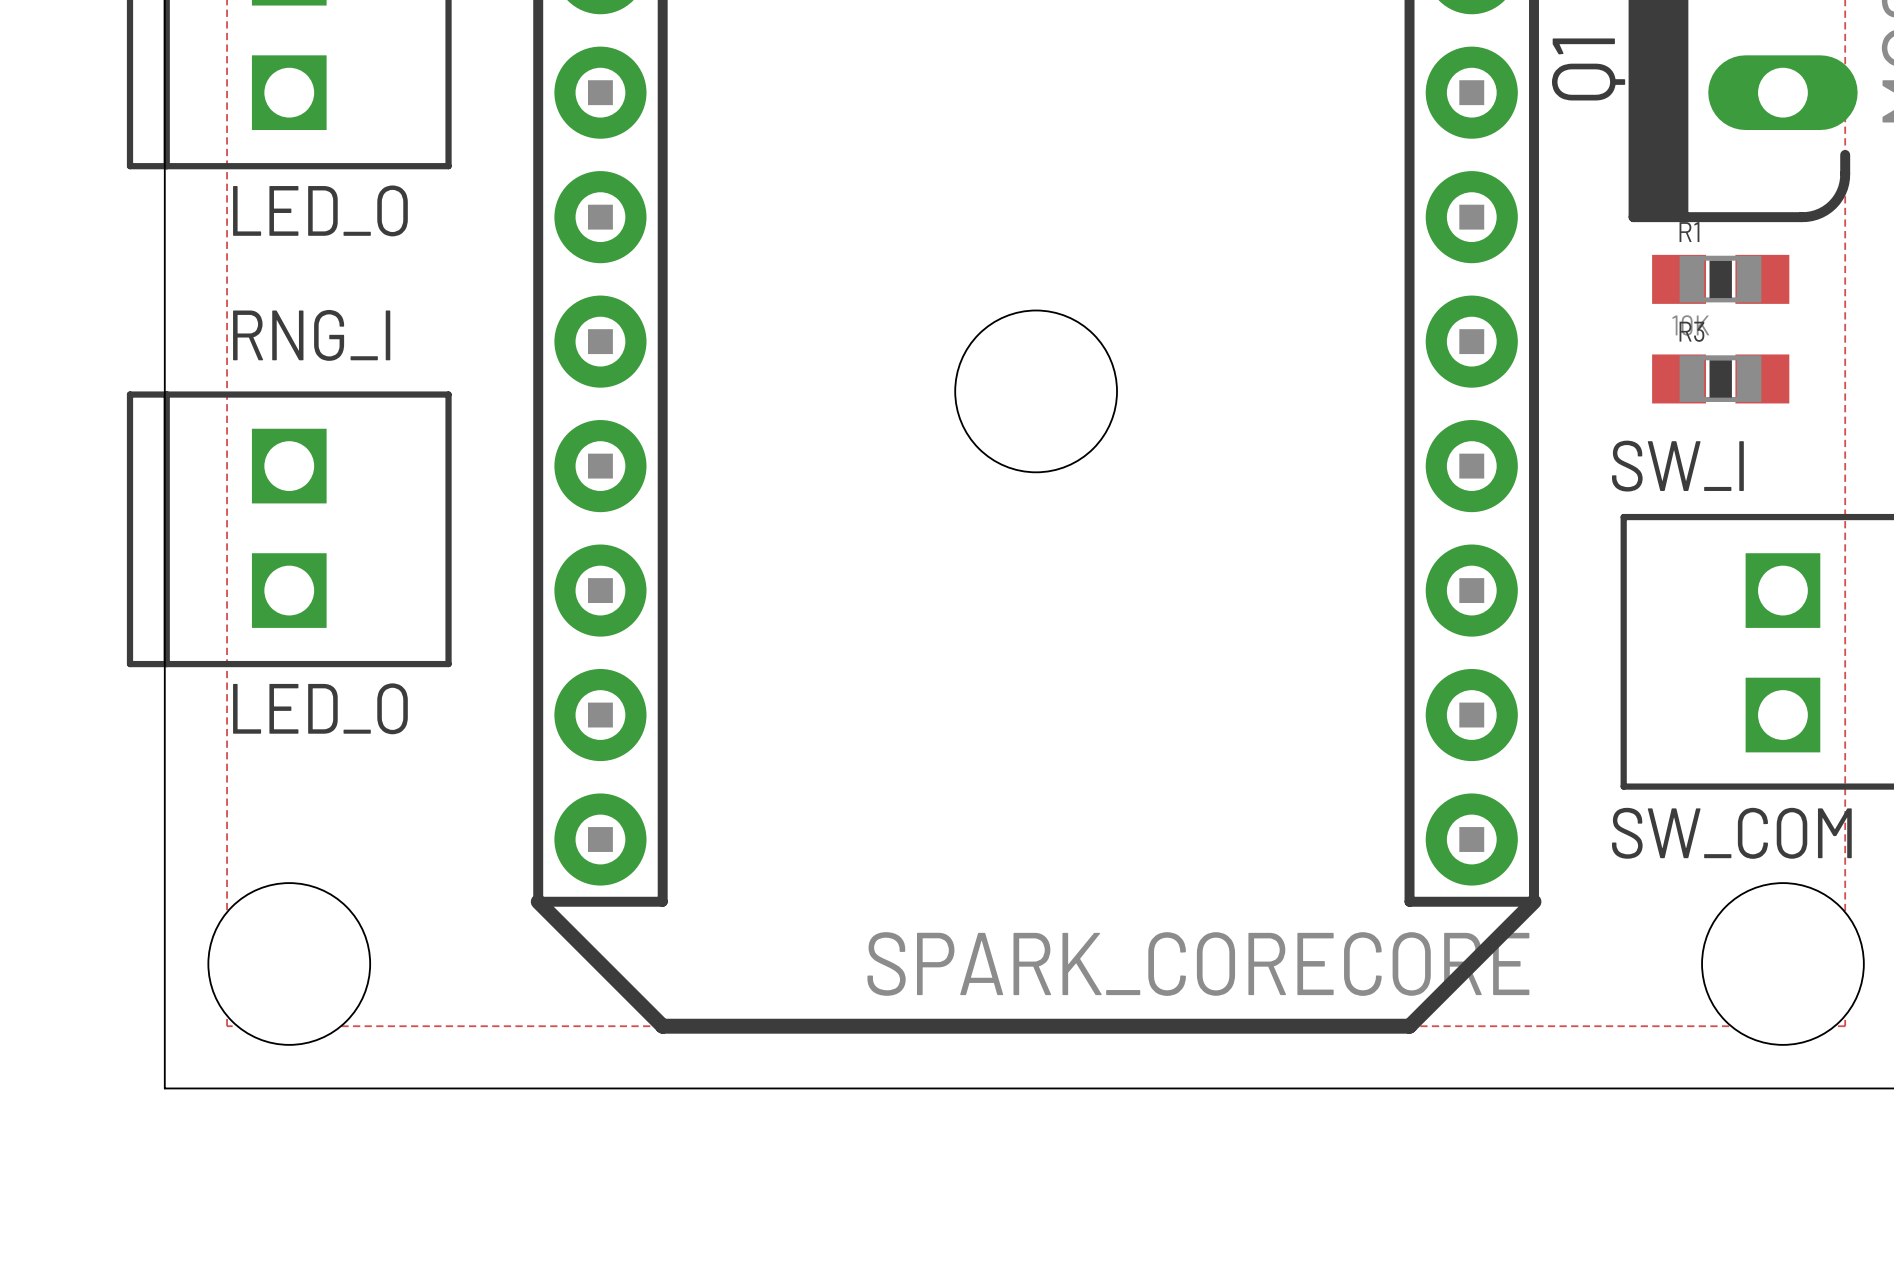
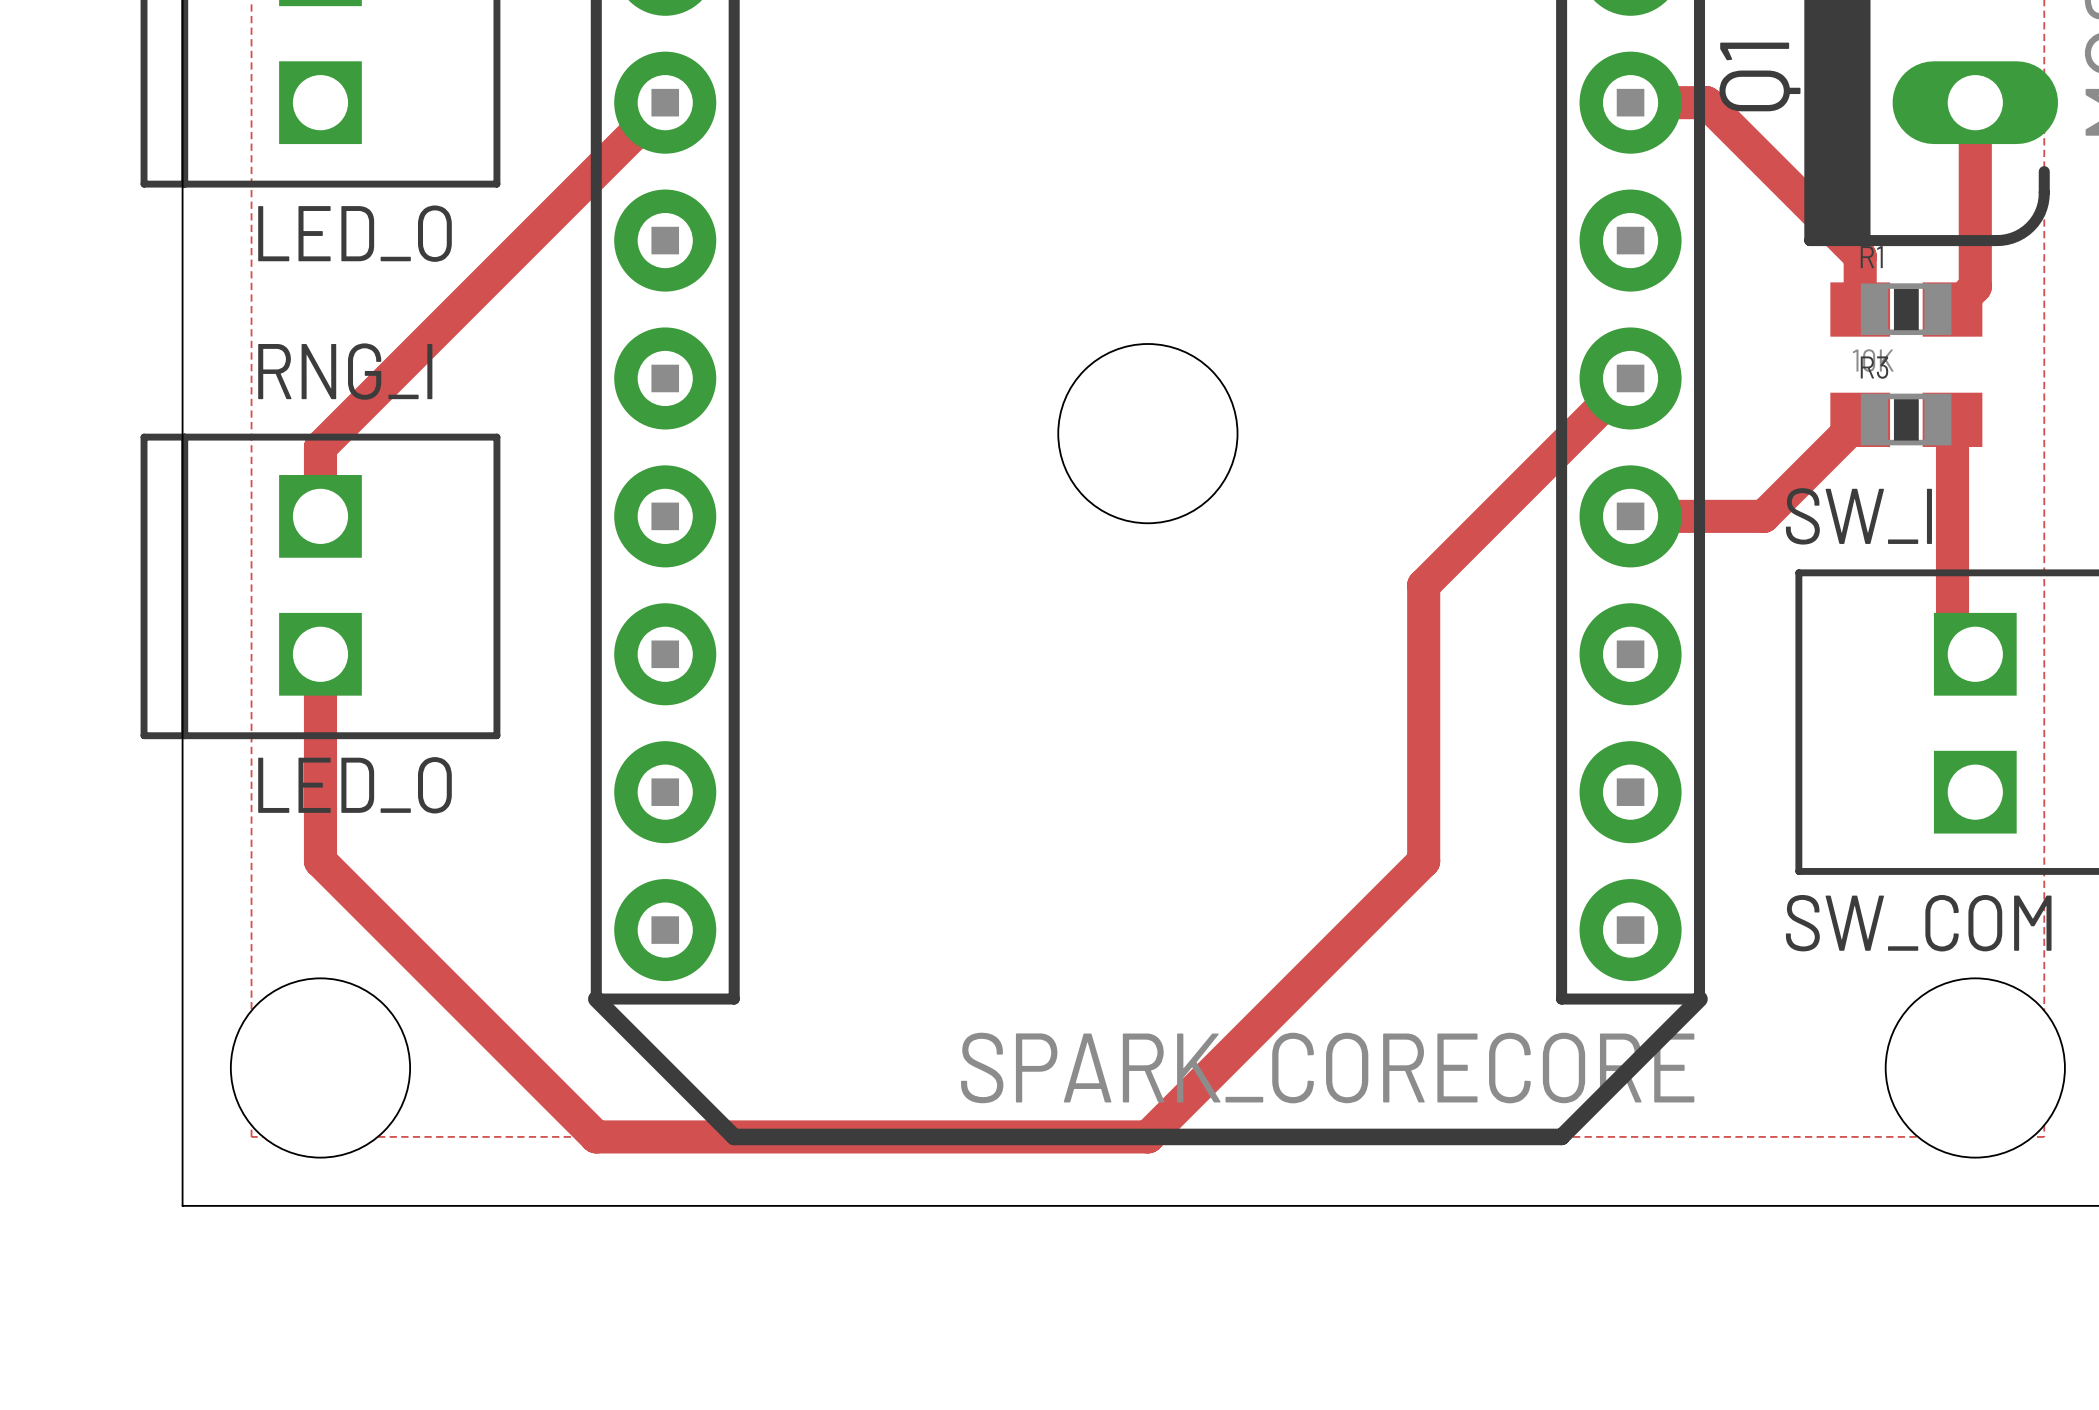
track: none -> (665, 102) (320, 447) (320, 516)
track: none -> (1630, 102) (1706, 102) (1860, 256) (1860, 309)
track: none -> (1975, 102) (1975, 286) (1952, 309)
track: none -> (1630, 378) (1423, 585) (1423, 861) (1147, 1136) (596, 1136) (320, 861) (320, 654)
track: none -> (1860, 419) (1763, 516) (1630, 516)
track: none -> (1952, 419) (1952, 631) (1975, 654)

